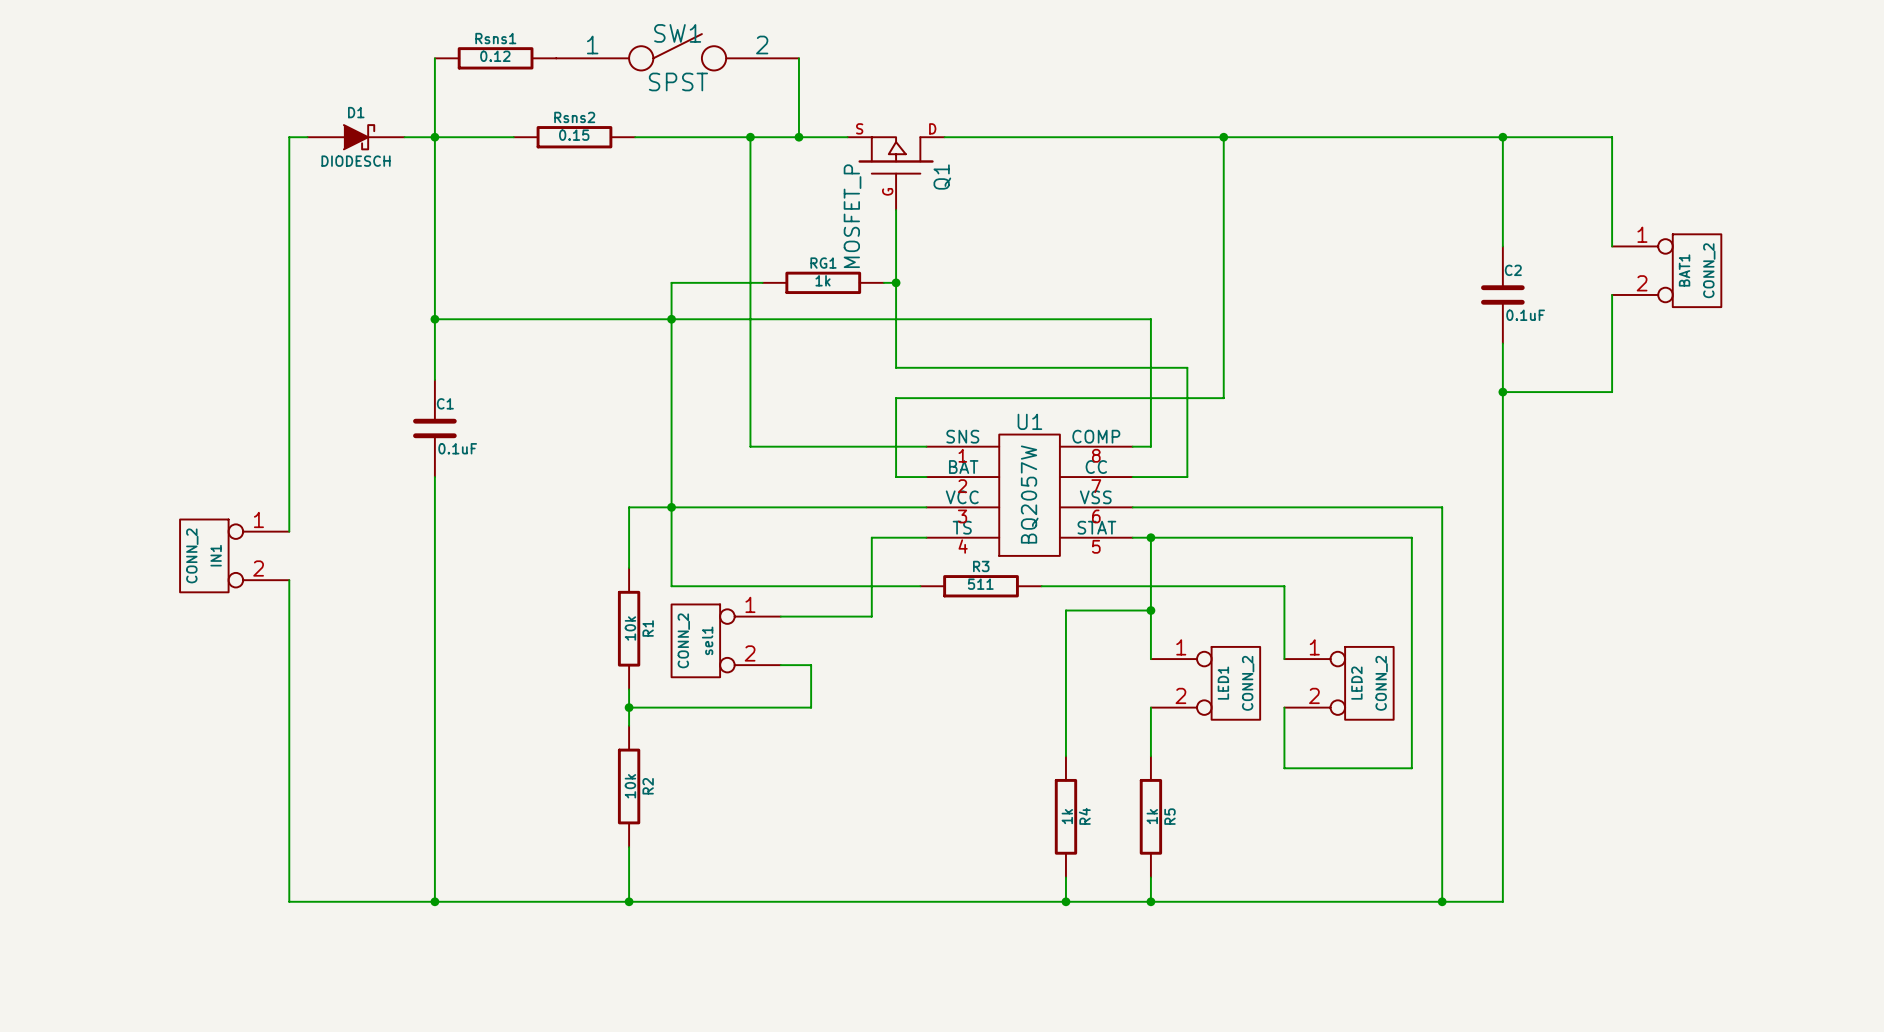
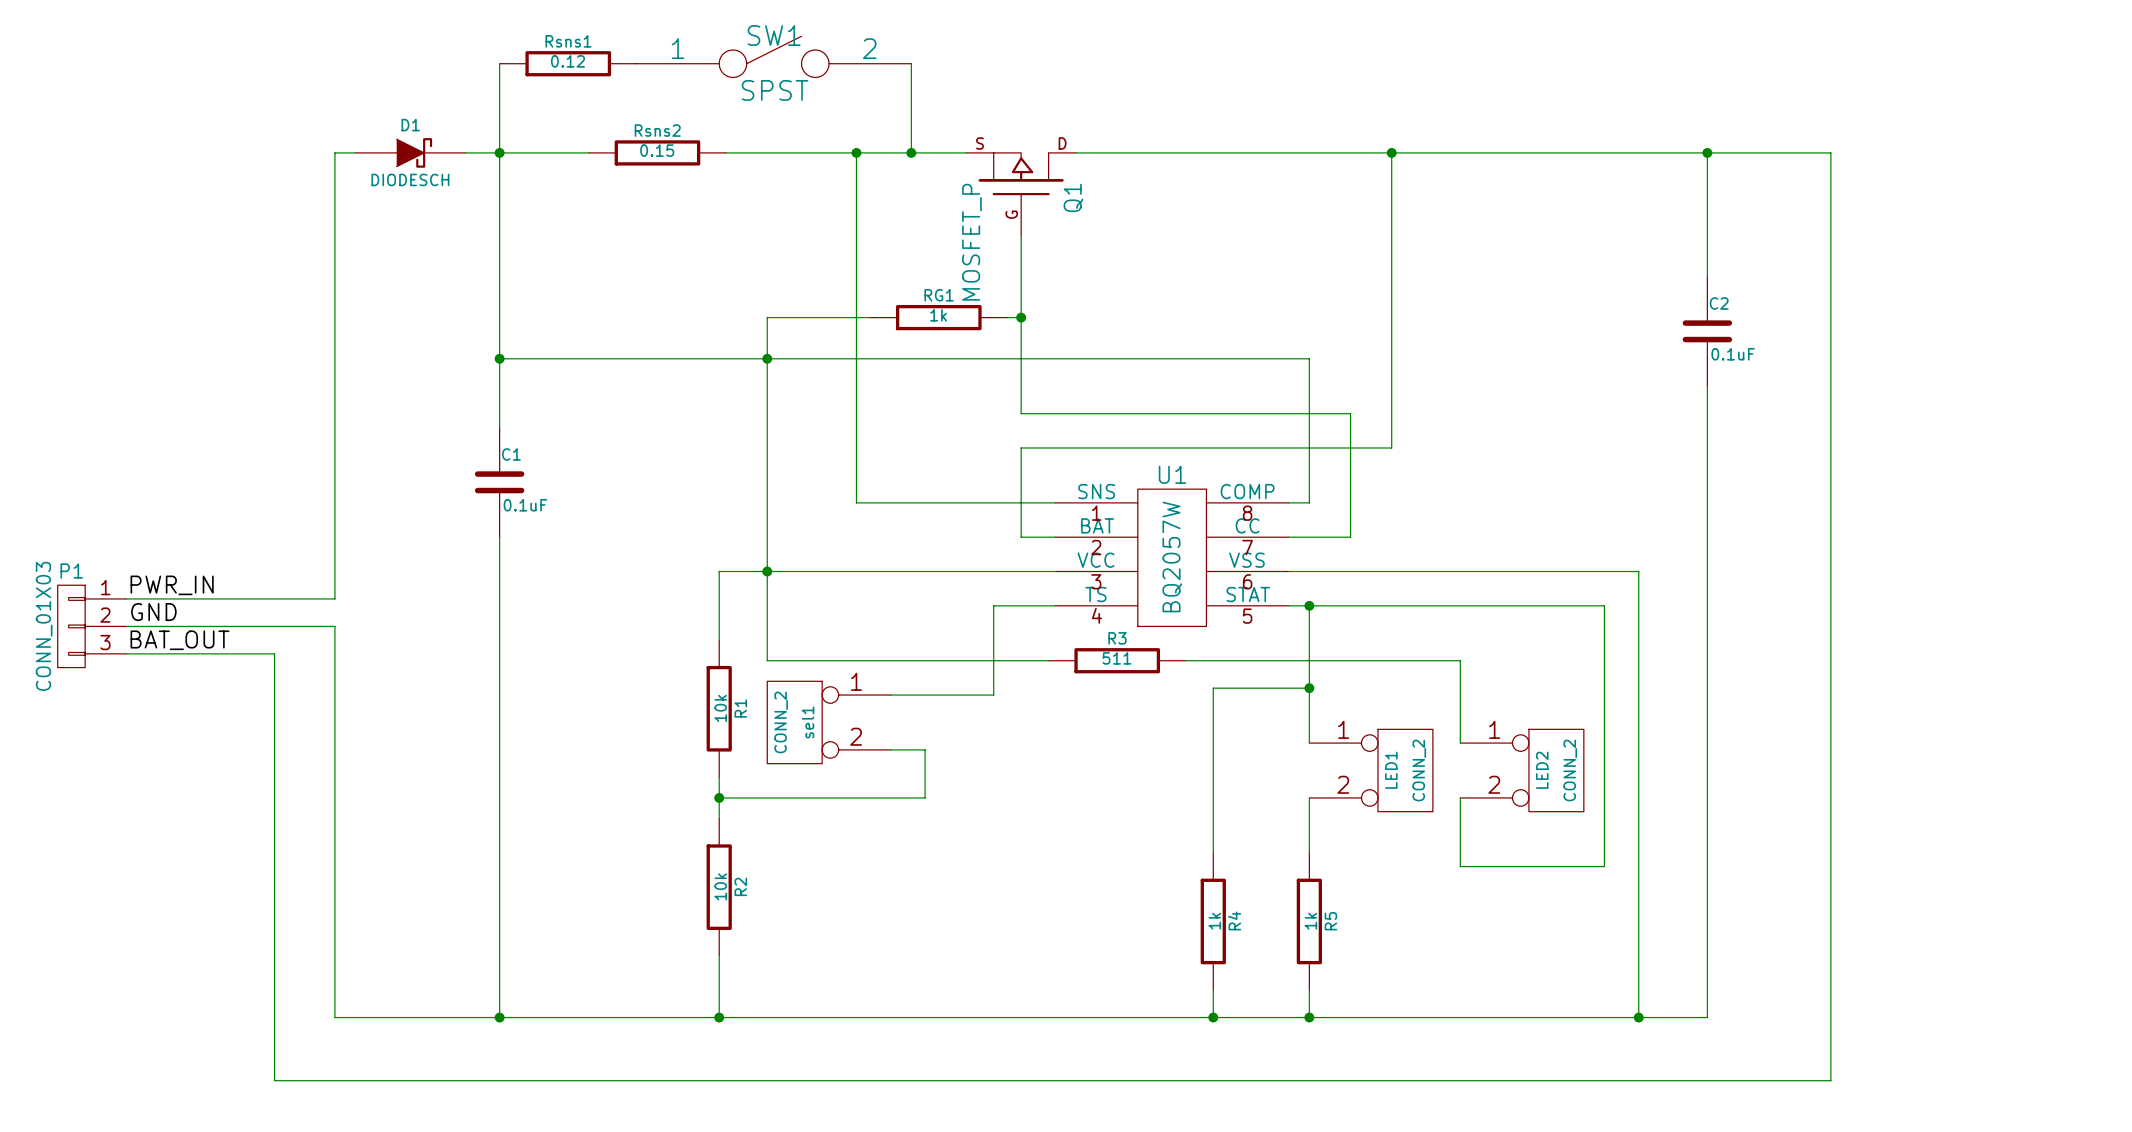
wire: none -> (1830, 276) (1830, 331)
BAT1: CONN_2 (1666, 270) -> none
wire: (1502, 392) (1612, 392) -> (126, 653) (274, 653) (274, 1080) (1830, 1080) (1830, 441)
junction: (1502, 392) -> none
label: none -> PWR_IN (172, 585)
wire: none -> (126, 598) (334, 598)
label: none -> GND (153, 612)
P1: none -> CONN_01X03 (92, 626)
wire: none -> (126, 626) (334, 626) (334, 653)
IN1: CONN_2 (234, 555) -> none
label: none -> BAT_OUT (179, 640)

